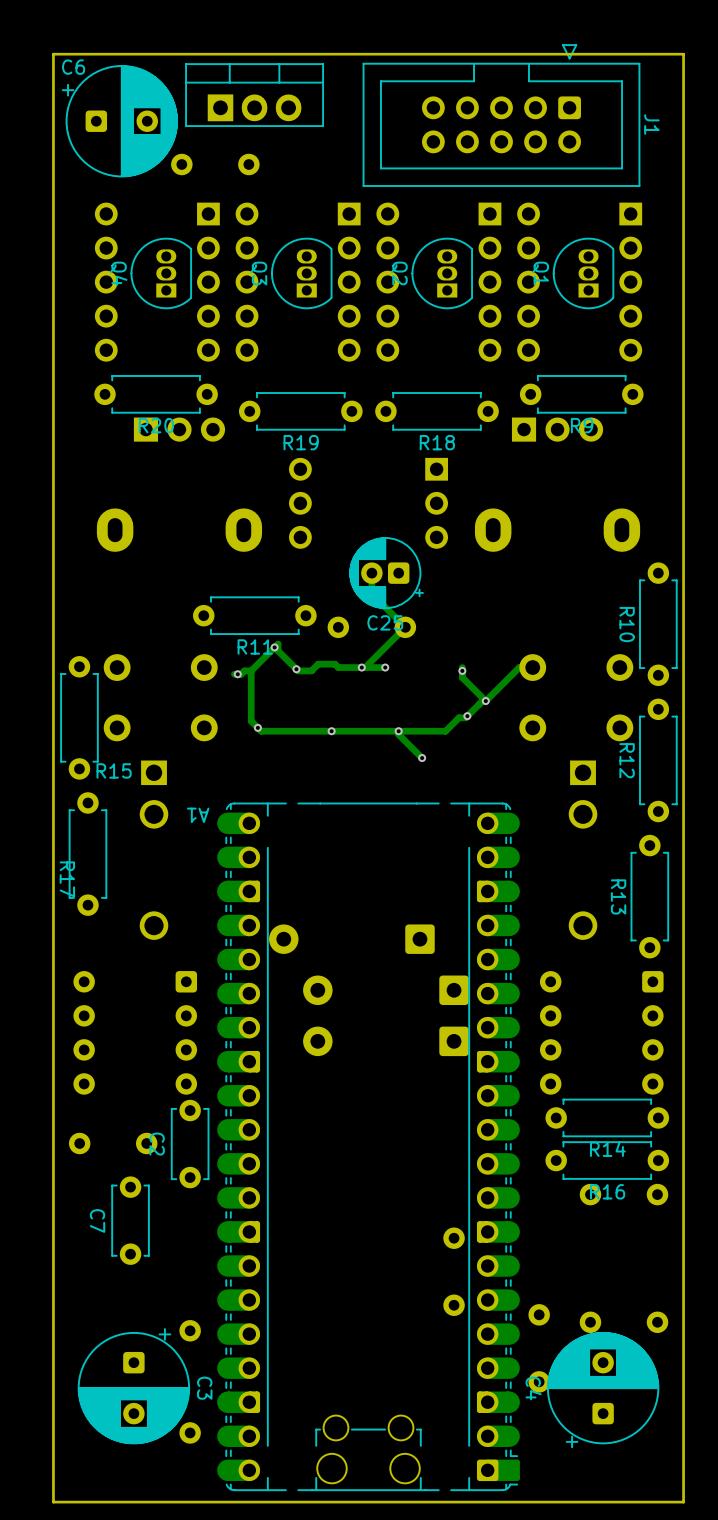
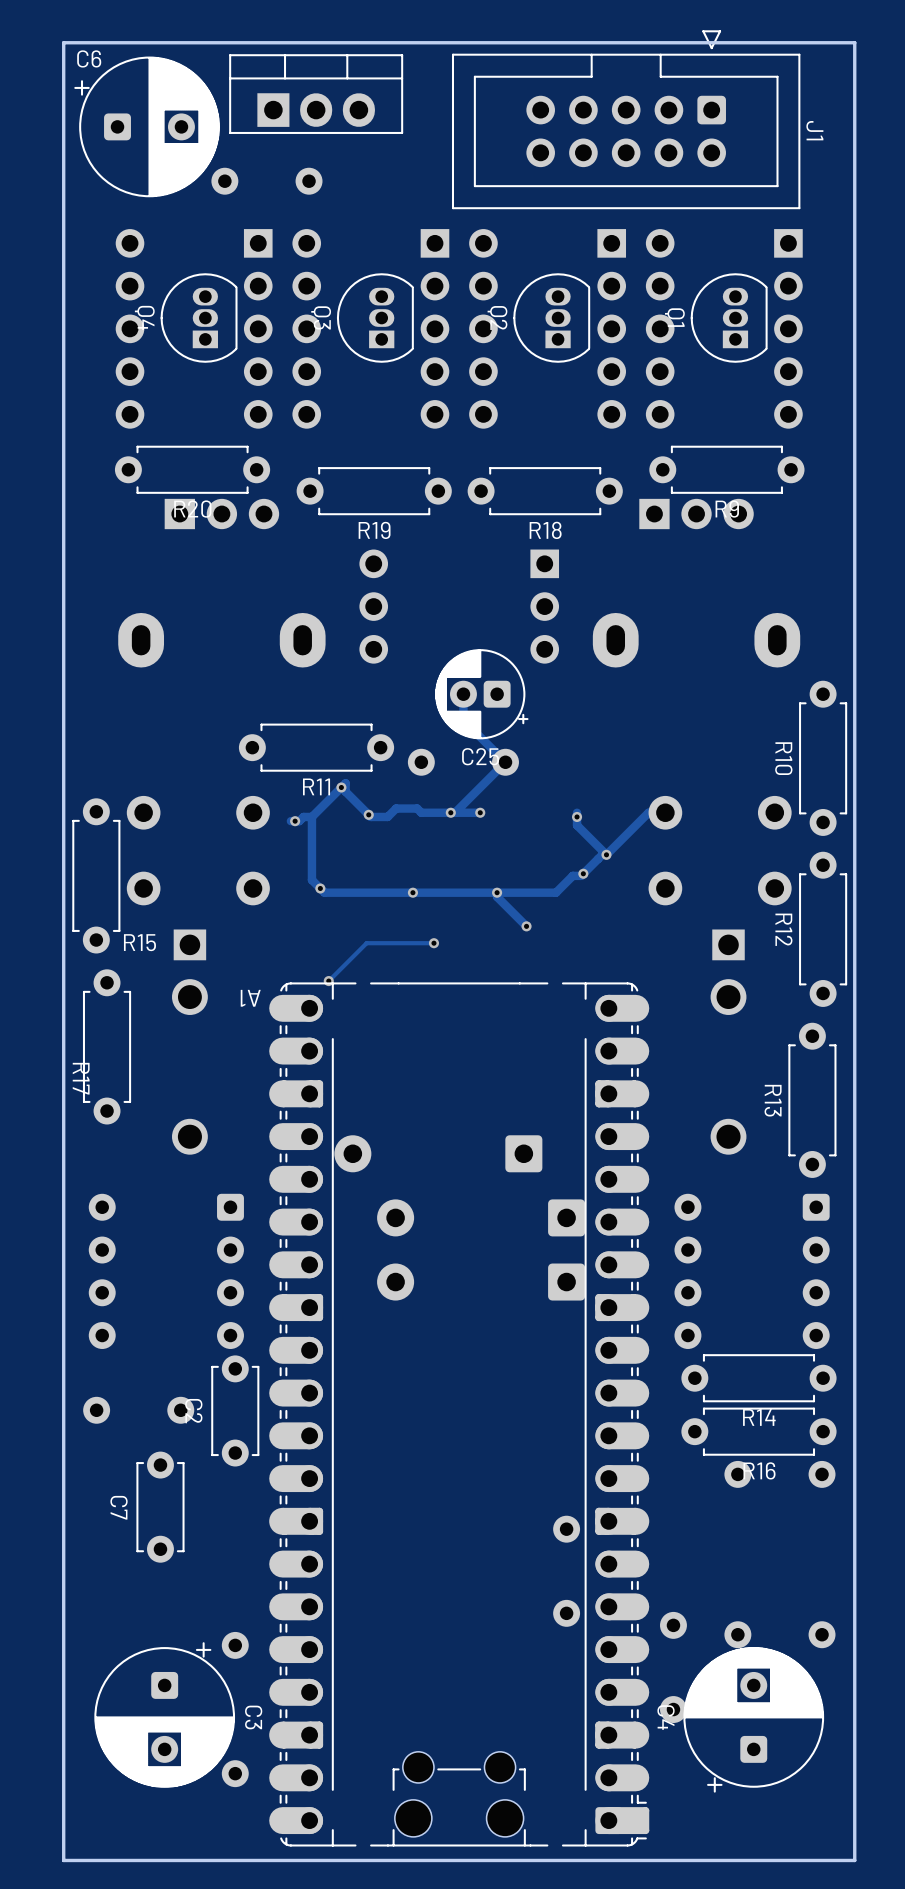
track: none -> (433, 943) (366, 943) (328, 981)
via: none -> (433, 943)
via: none -> (328, 981)

